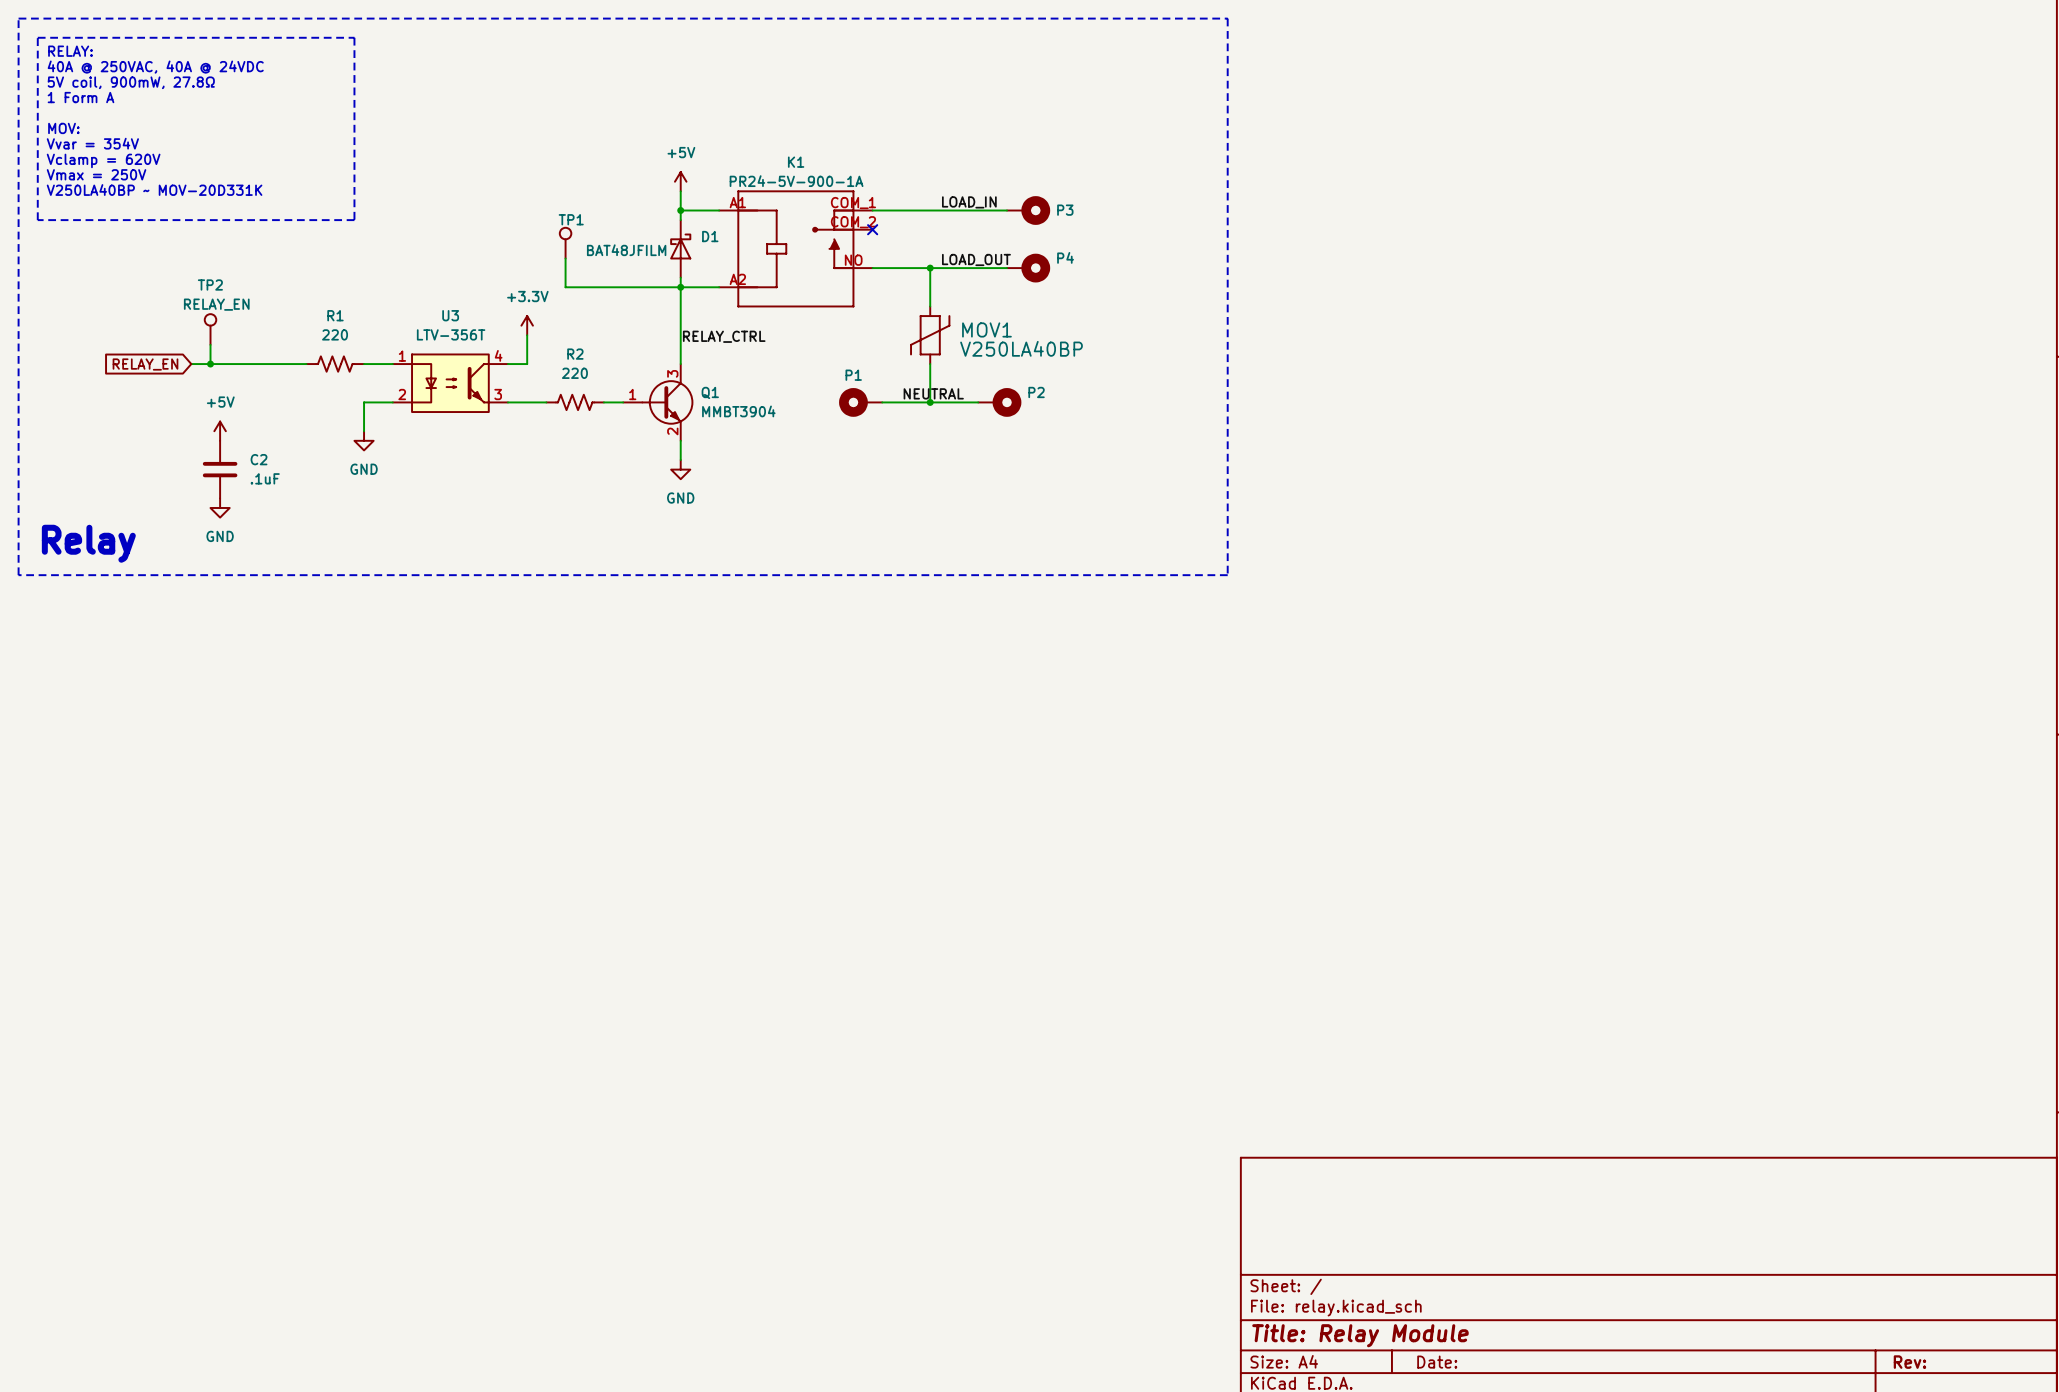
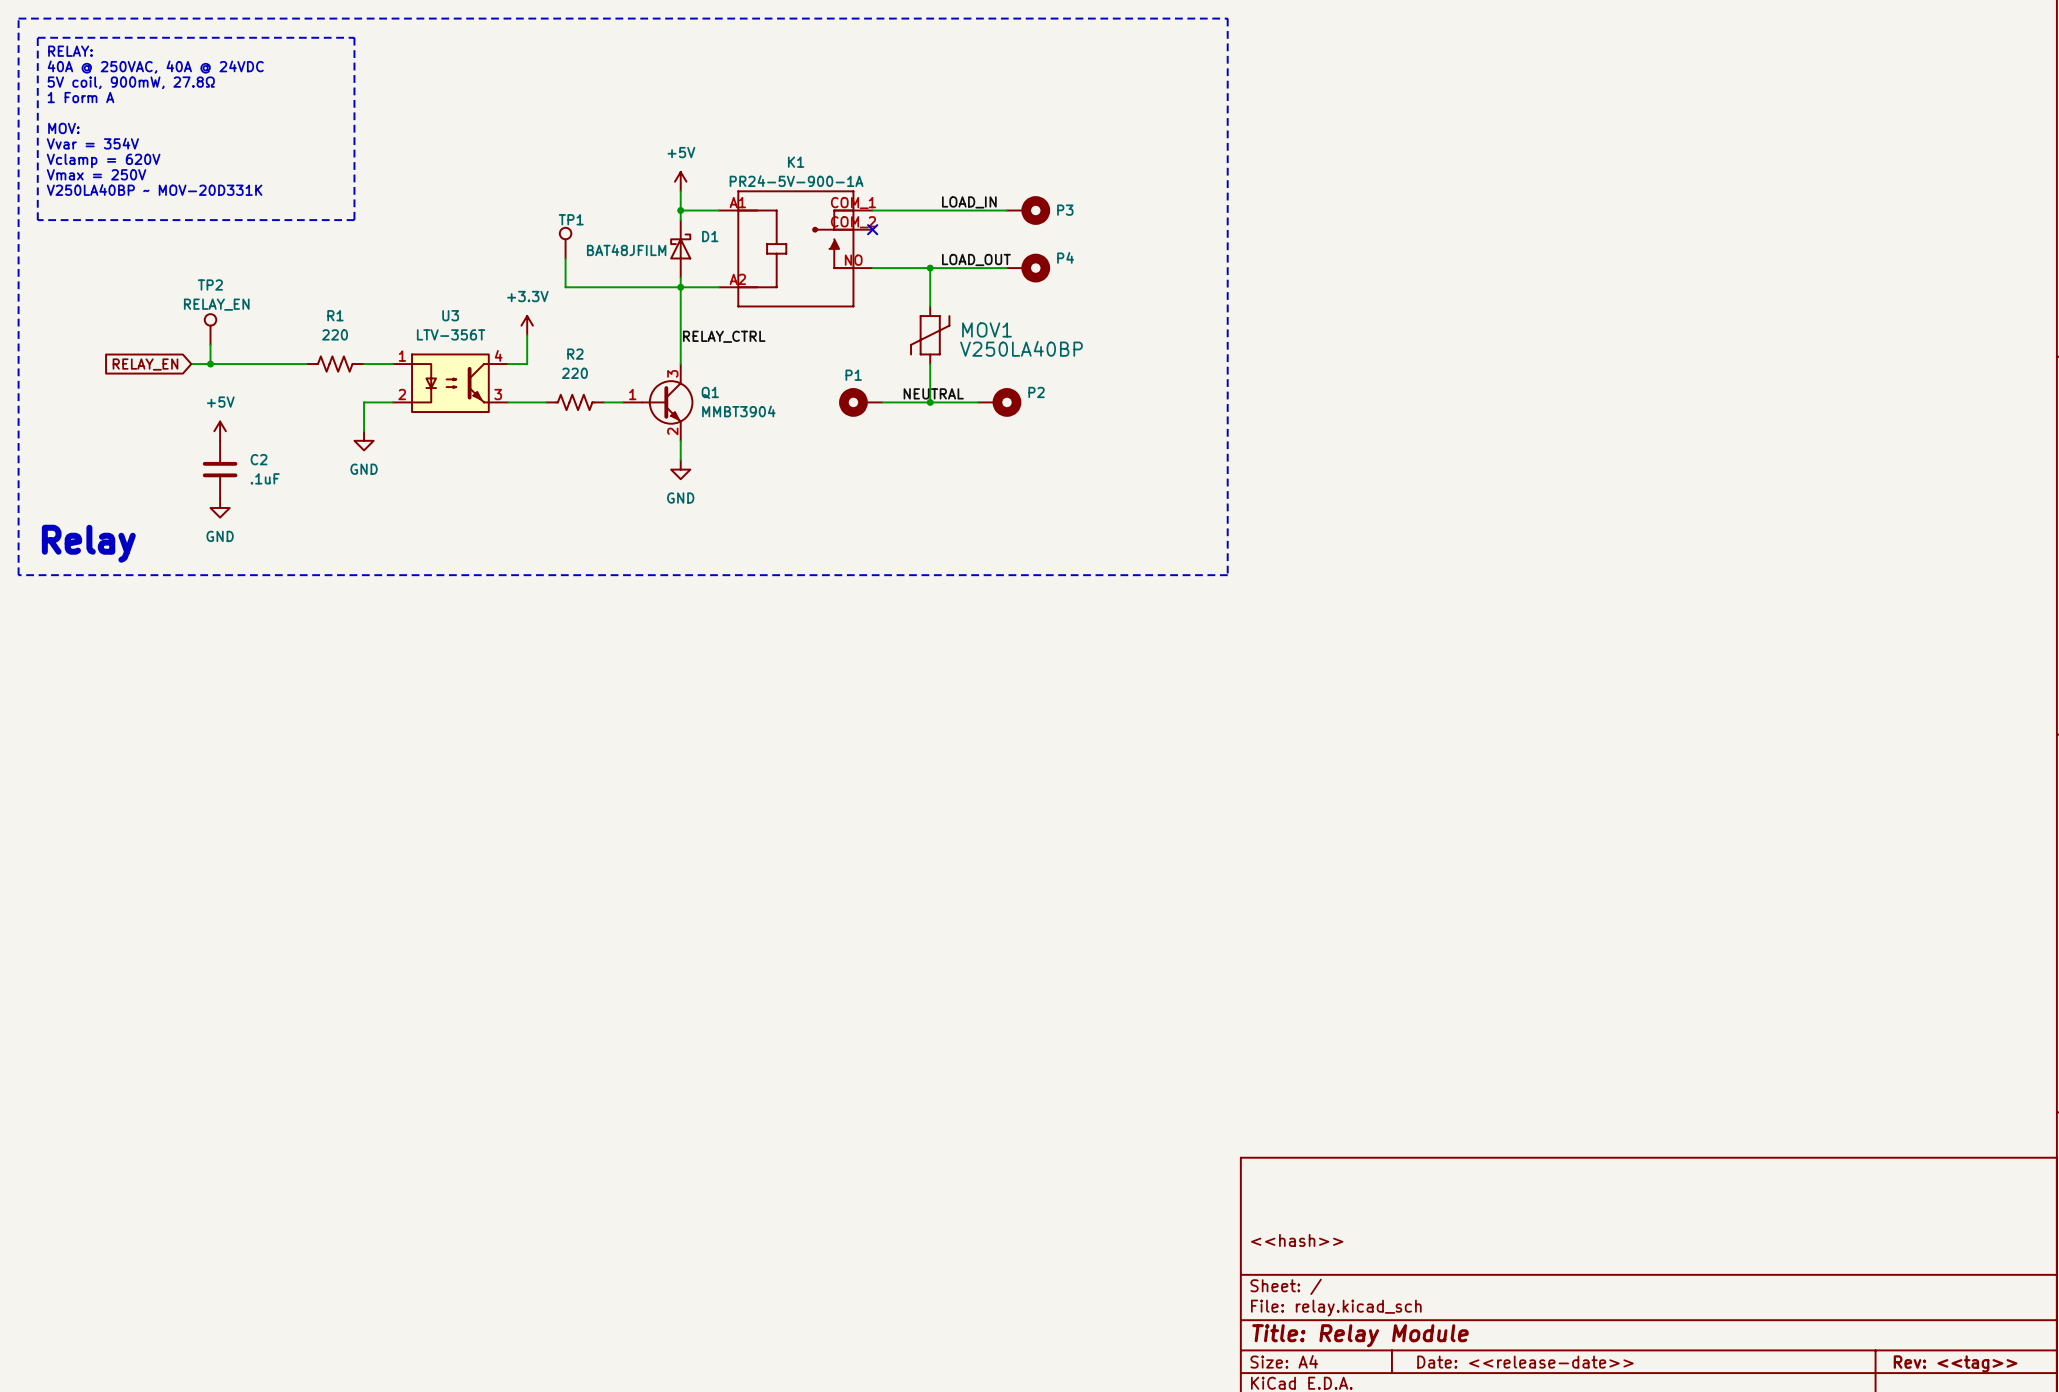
title block: none -> <<hash>> (1297, 1240)
title block: Date: (1437, 1362) -> Date: <<release-date>> (1525, 1362)
title block: Rev: (1909, 1362) -> Rev: <<tag>> (1955, 1363)

